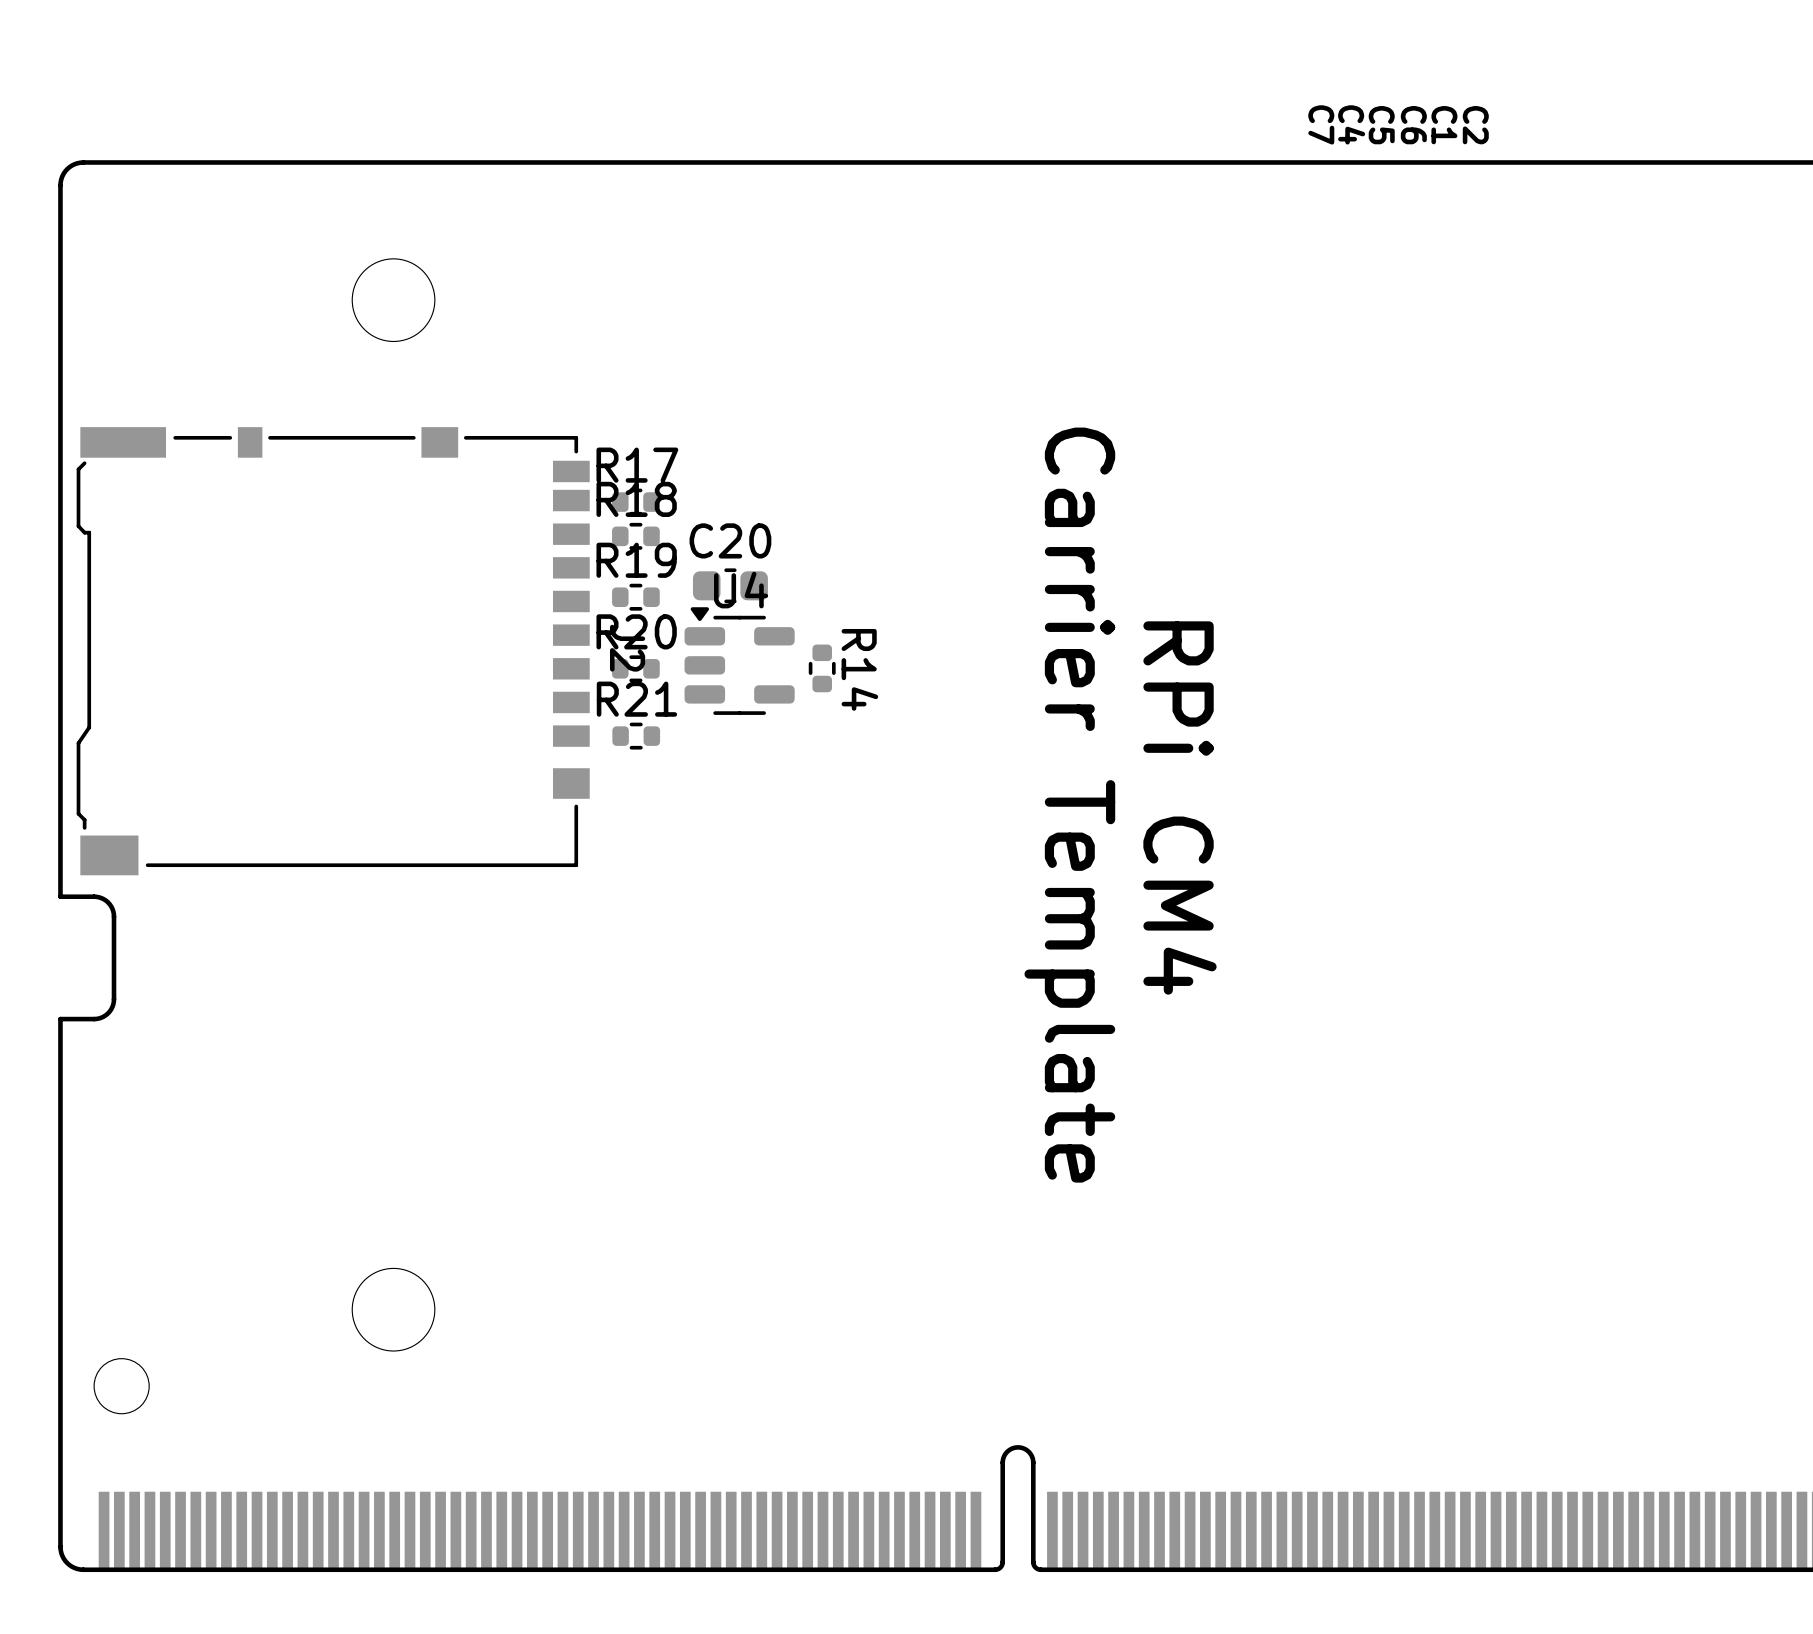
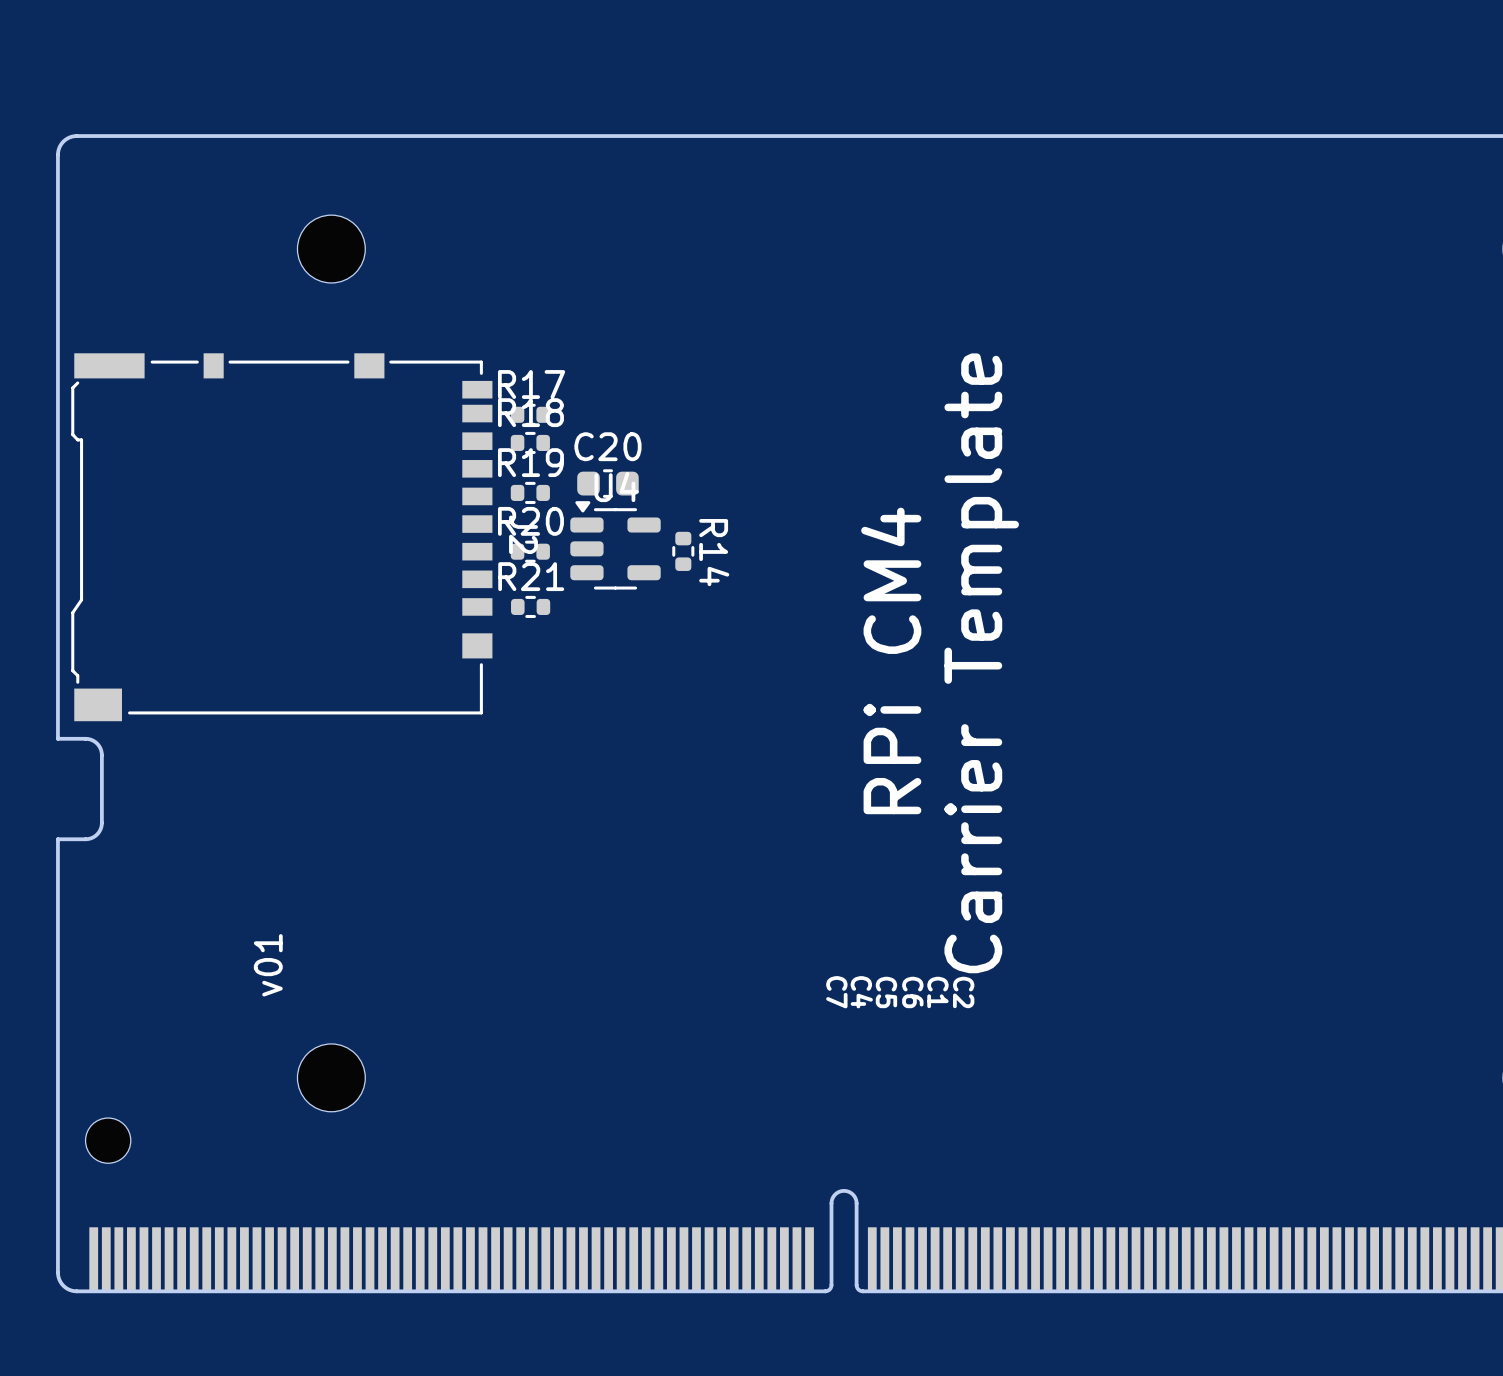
C7 position: (1321, 124) -> (836, 992)
C4 position: (1351, 124) -> (861, 992)
C5 position: (1381, 125) -> (886, 992)
C6 position: (1413, 125) -> (912, 992)
C1 position: (1444, 125) -> (937, 992)
C2 position: (1475, 125) -> (963, 992)
text: Carrier Template (1069, 805) -> RPi CM4 (891, 660)
text: RPi CM4 (1179, 808) -> Carrier Template (981, 663)
text: none -> v01 (268, 965)

